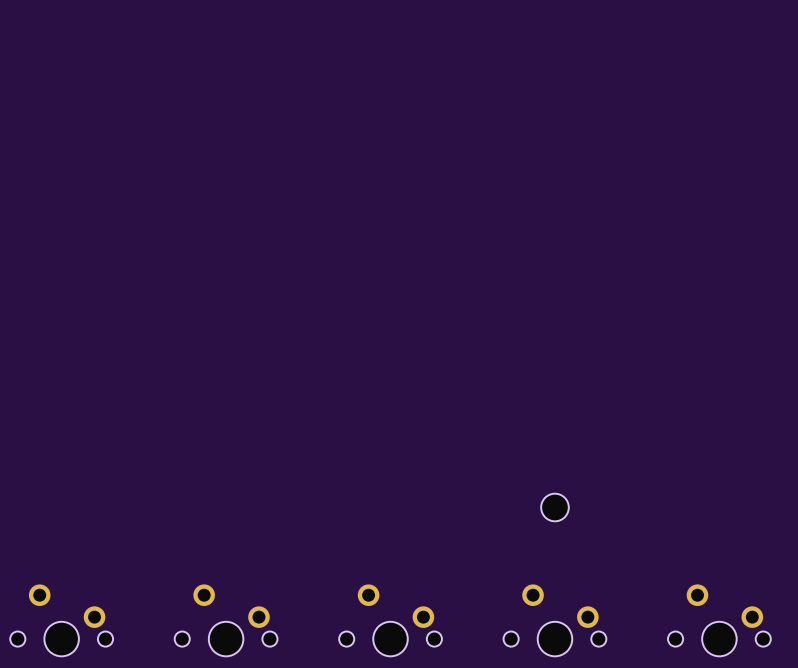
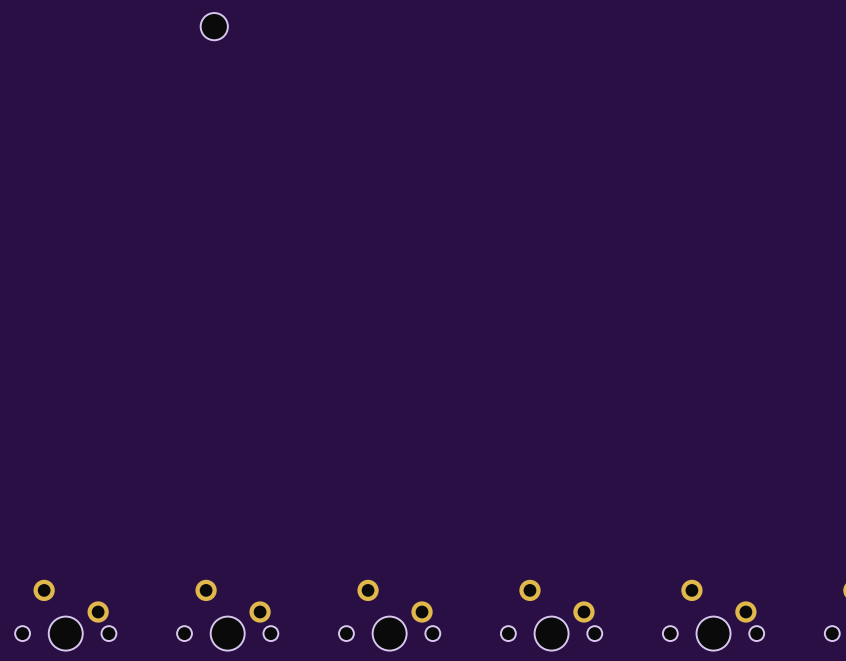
part: none -> (214, 26)
part: (554, 507) -> none

